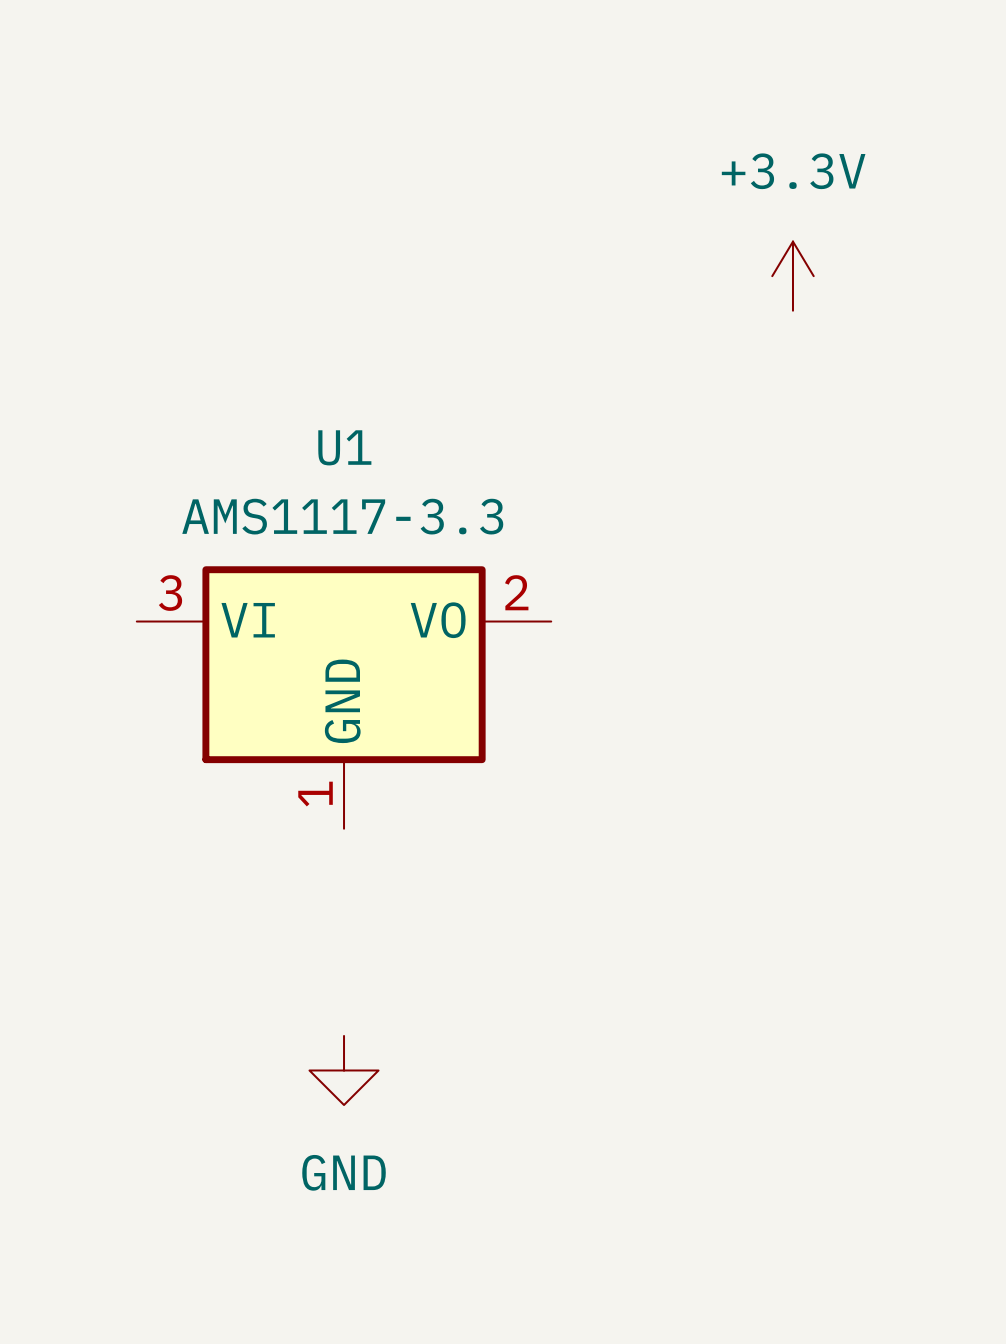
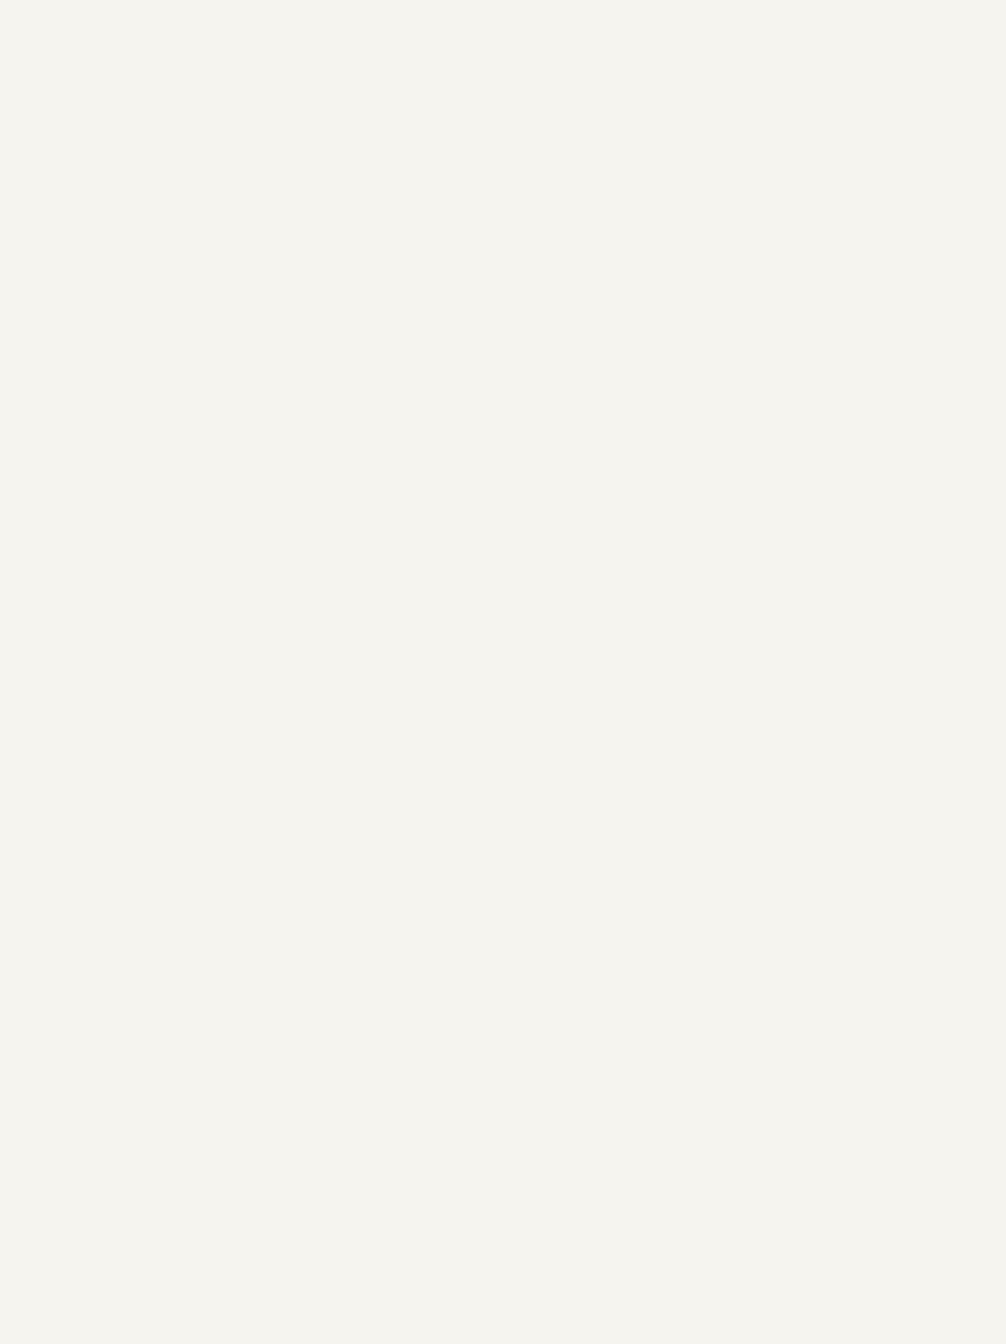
power symbol: +3.3V (792, 276) -> none
U1: AMS1117-3.3 (344, 697) -> none
power symbol: GND (344, 1070) -> none

